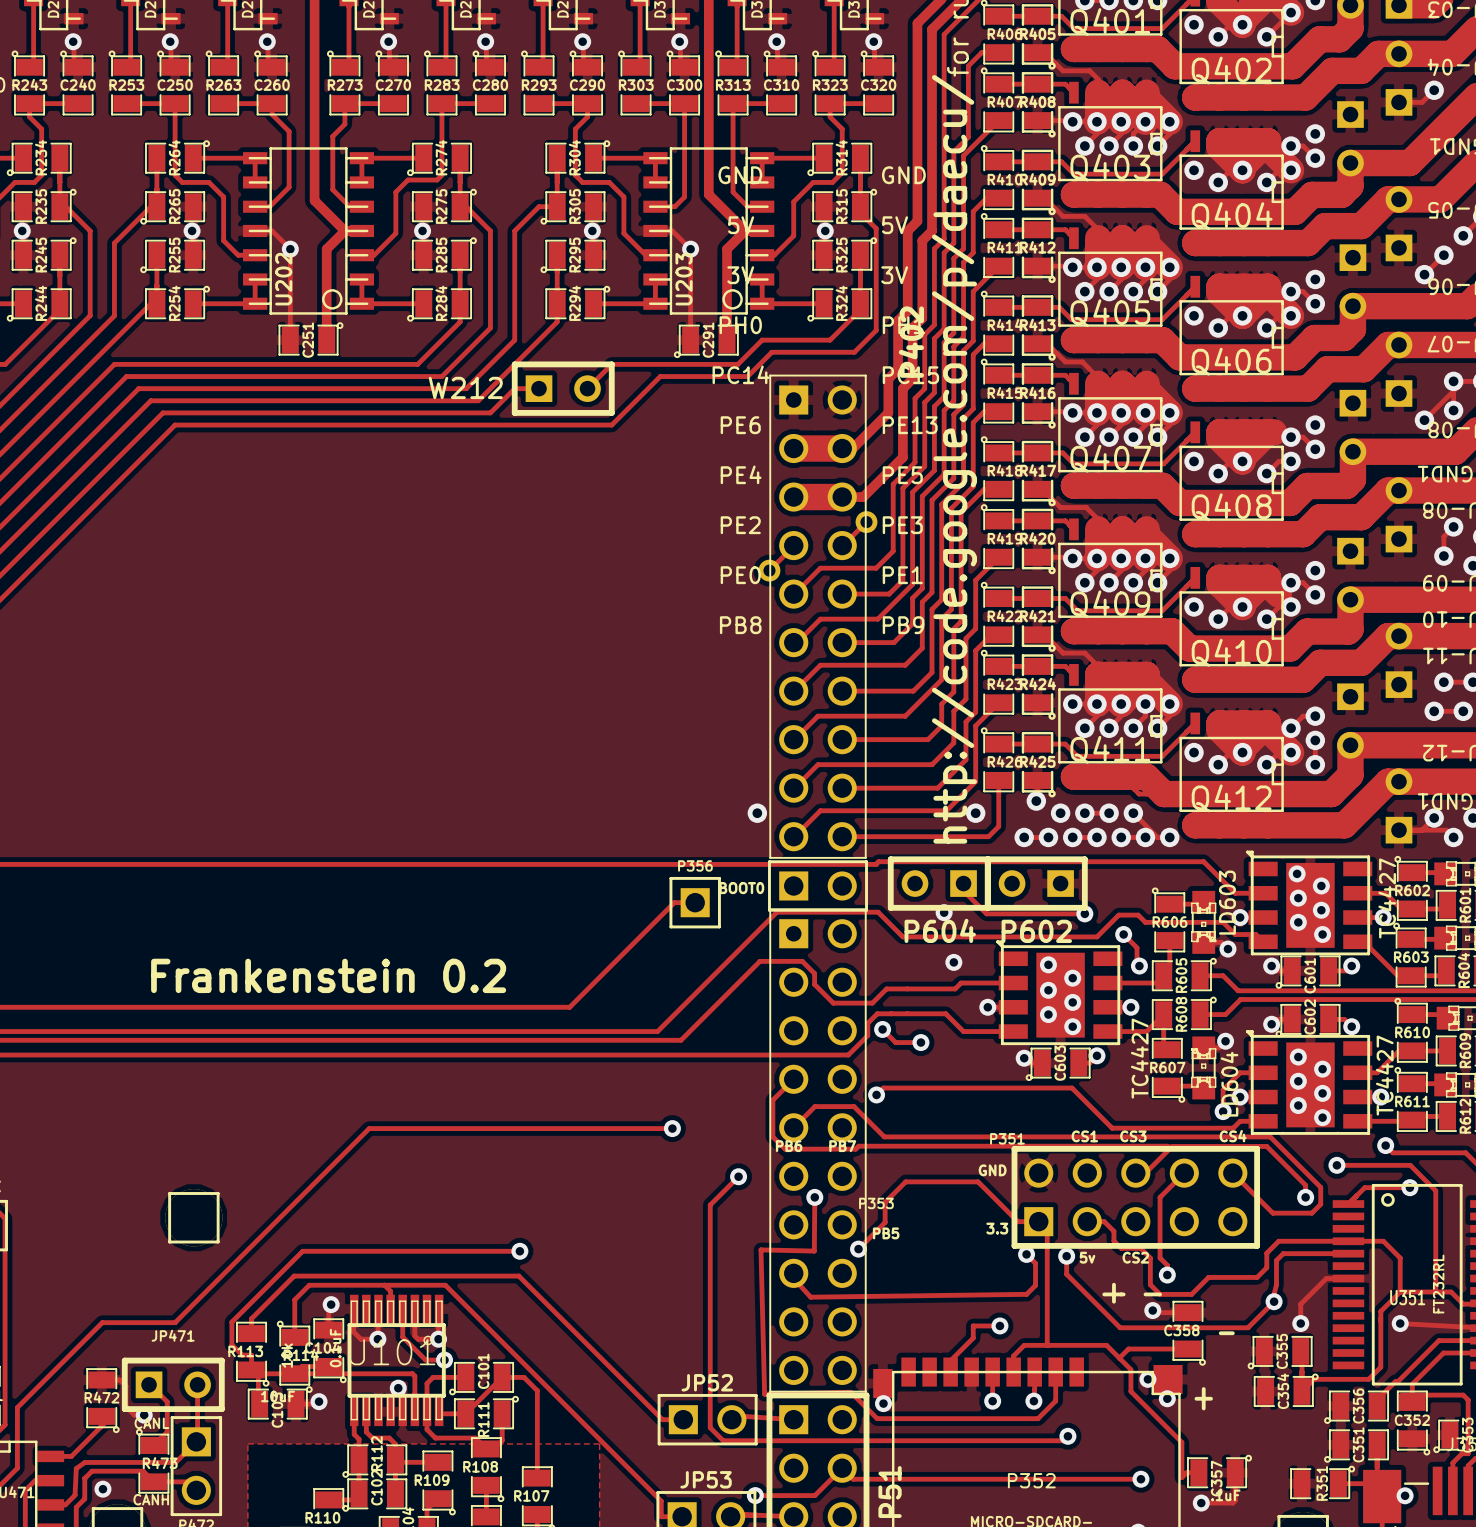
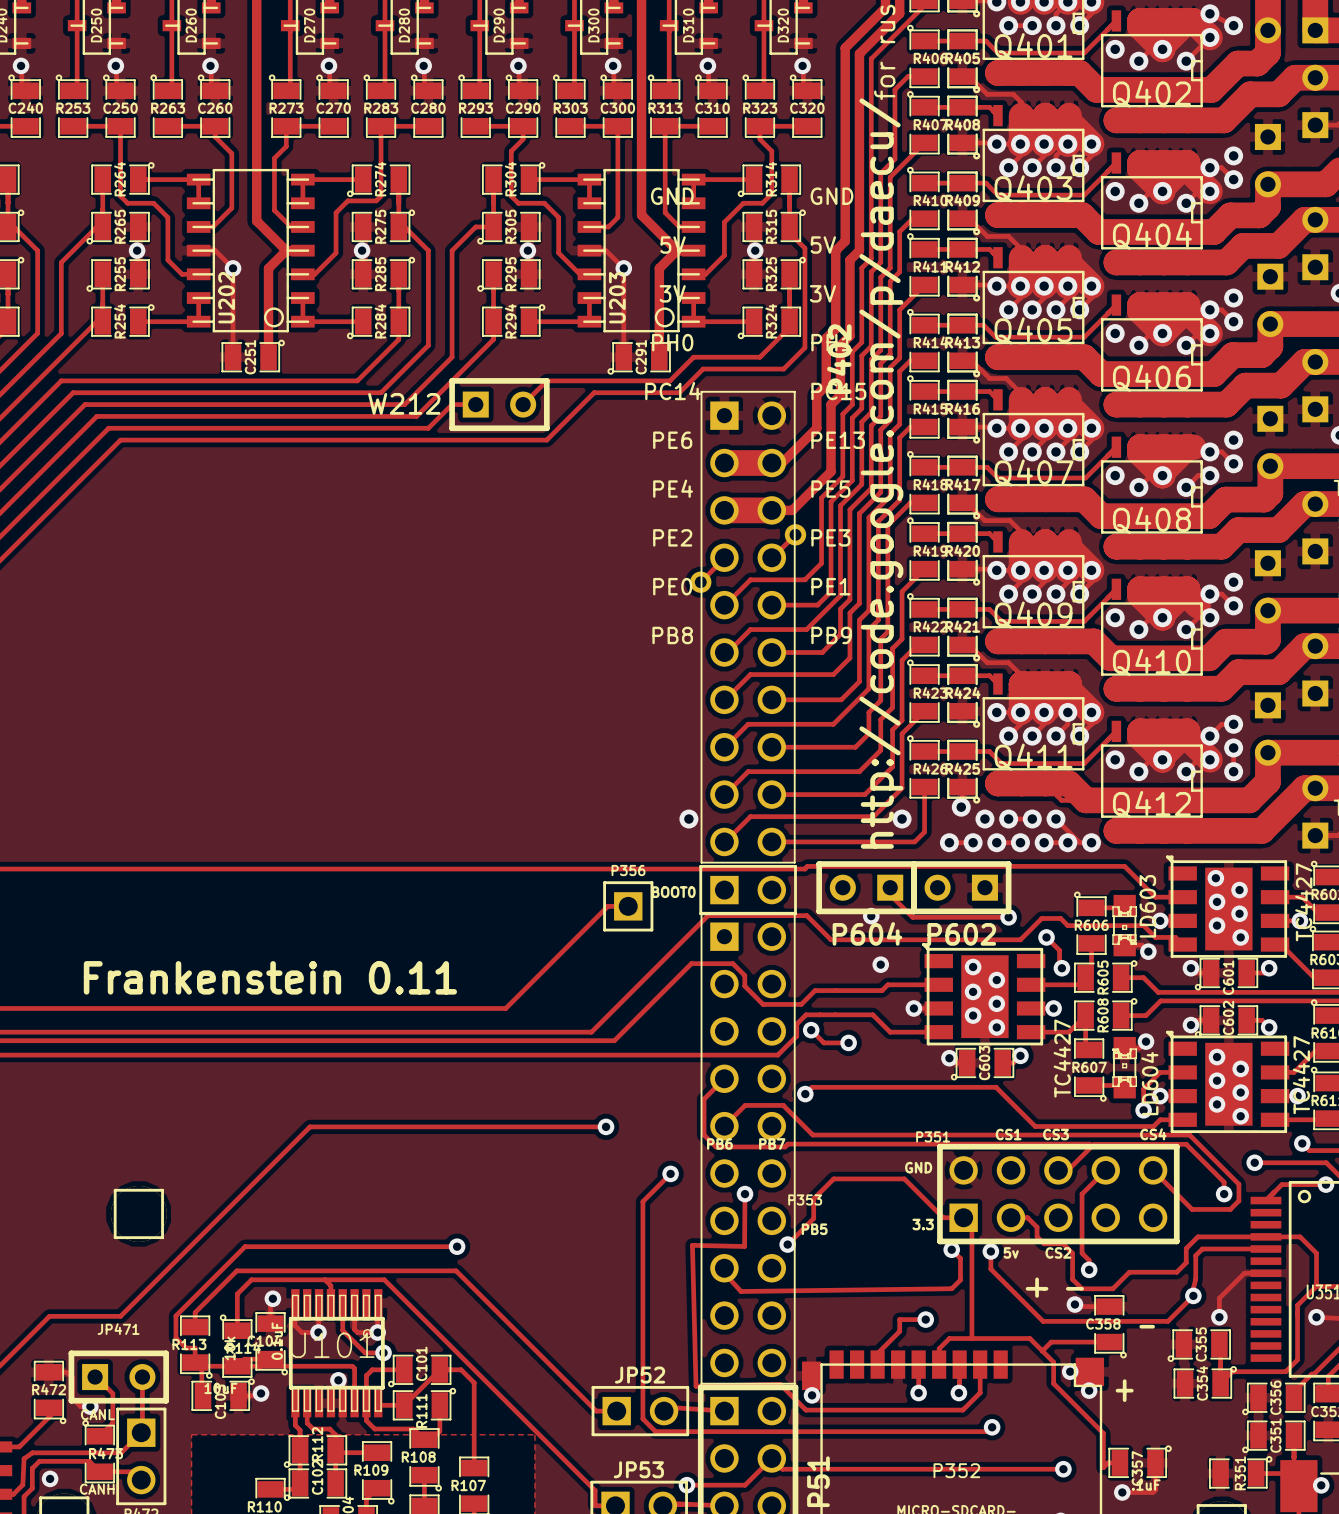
text: Frankenstein 0.2 (328, 975) -> Frankenstein 0.11 (270, 977)

